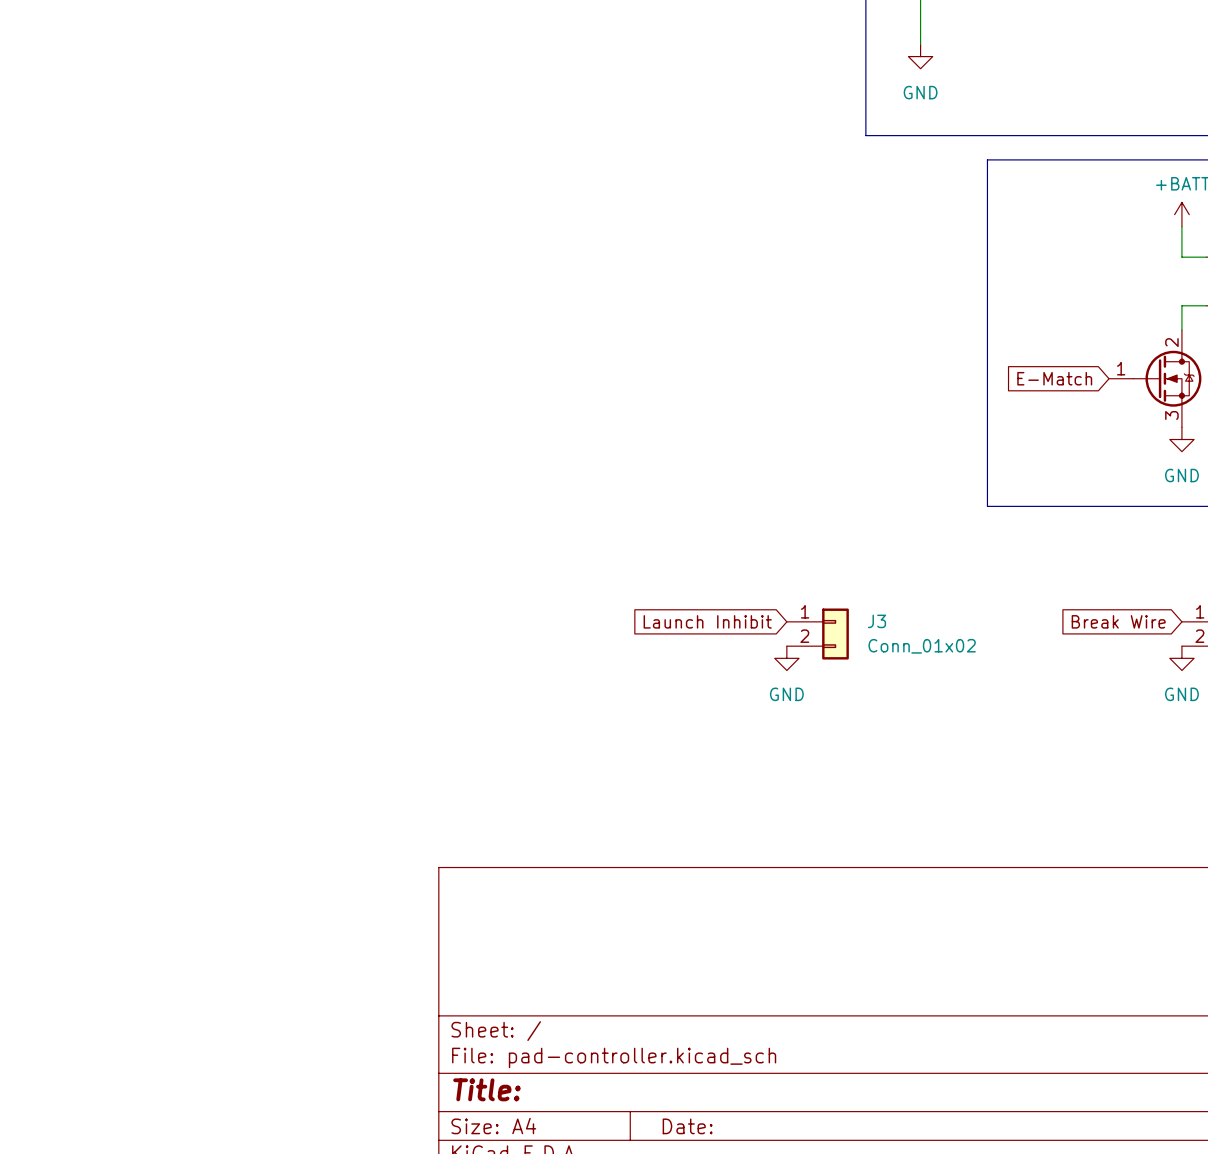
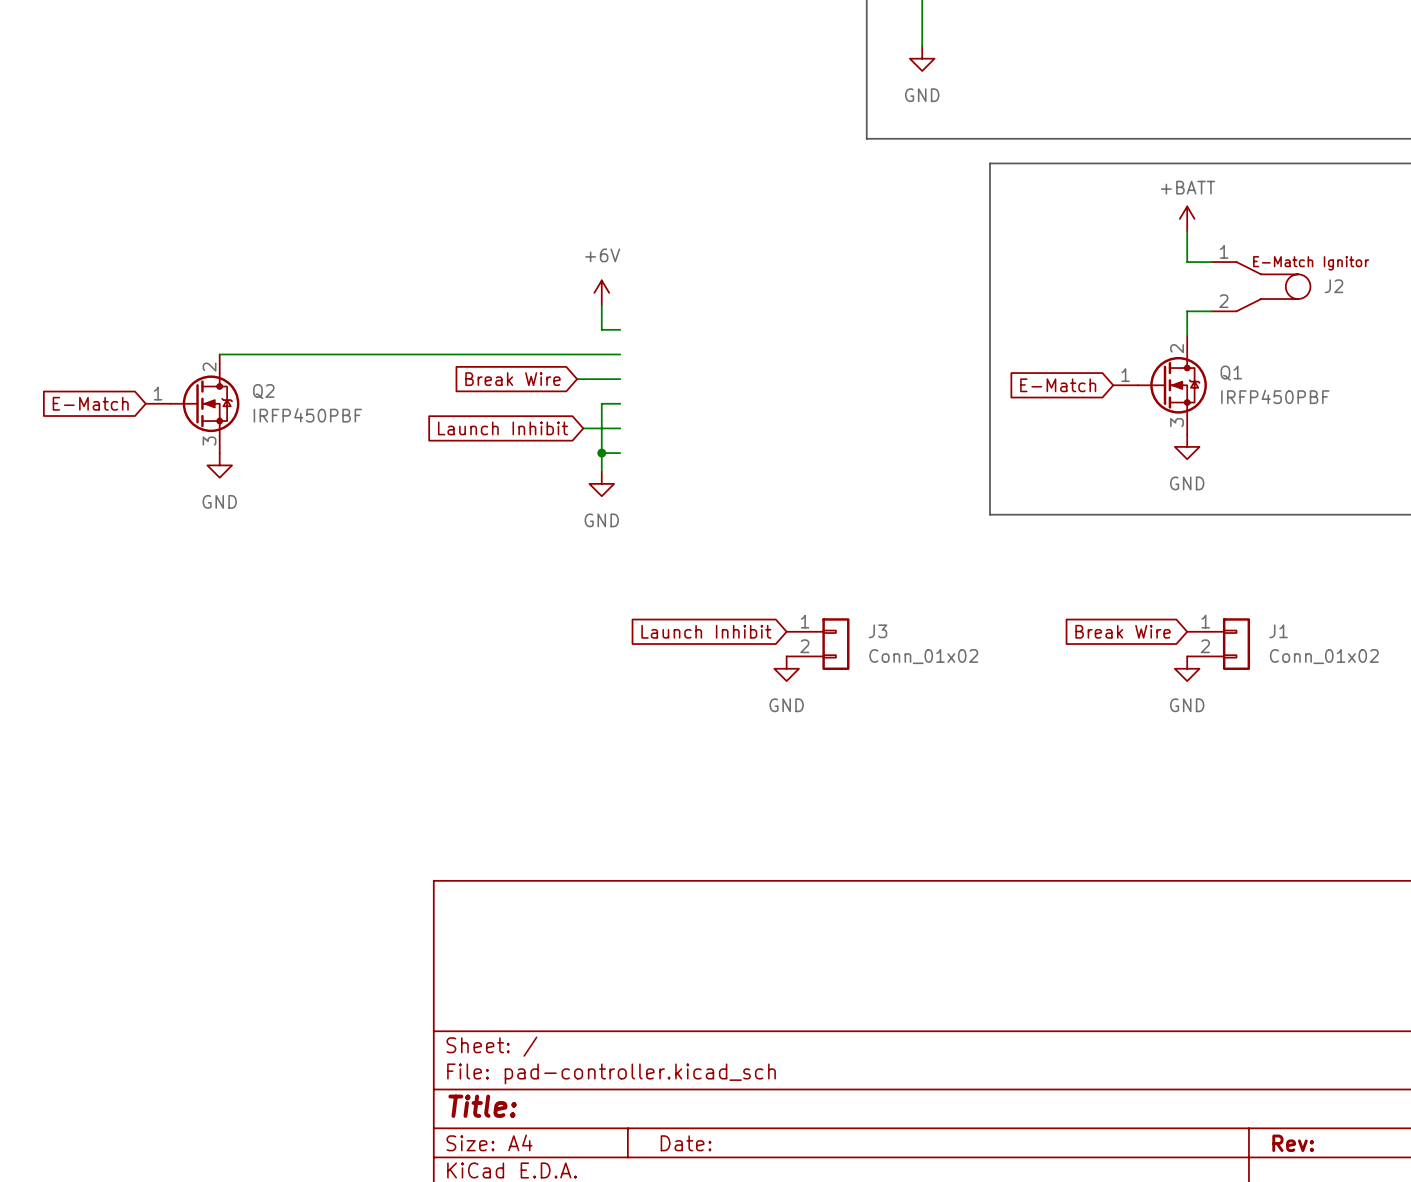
power symbol: none -> +6V (601, 292)
wire: none -> (601, 305) (601, 329) (620, 329)
wire: none -> (219, 354) (620, 354)
global label: none -> Break Wire (512, 379)
wire: none -> (577, 379) (620, 379)
global label: none -> E-Match (90, 403)
Q2: none -> IRFP450PBF (192, 403)
wire: none -> (620, 403) (601, 403) (601, 471)
global label: none -> Launch Inhibit (503, 428)
wire: none -> (583, 428) (620, 428)
wire: none -> (601, 453) (620, 453)
junction: none -> (601, 453)
power symbol: none -> GND (219, 465)
power symbol: none -> GND (601, 483)

